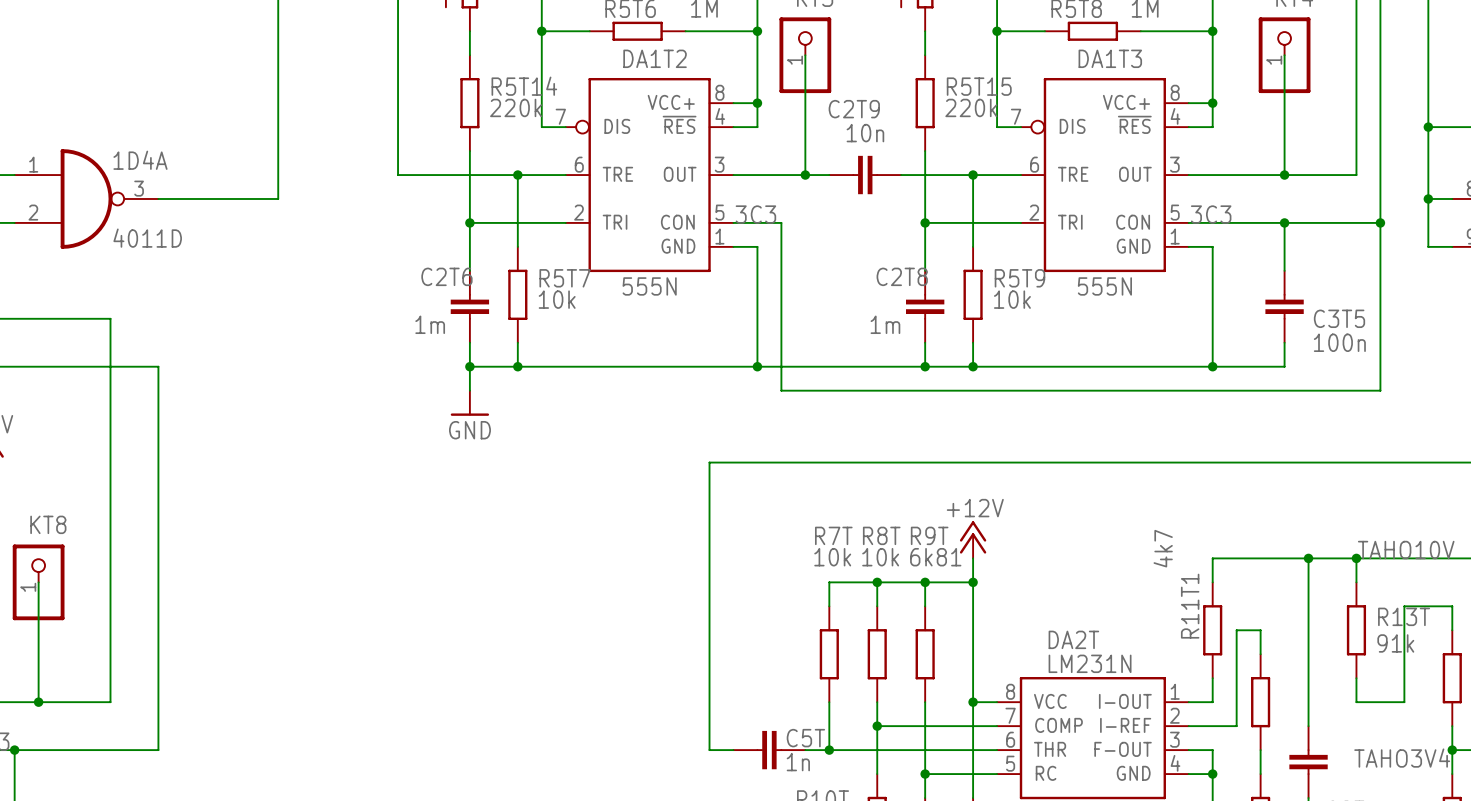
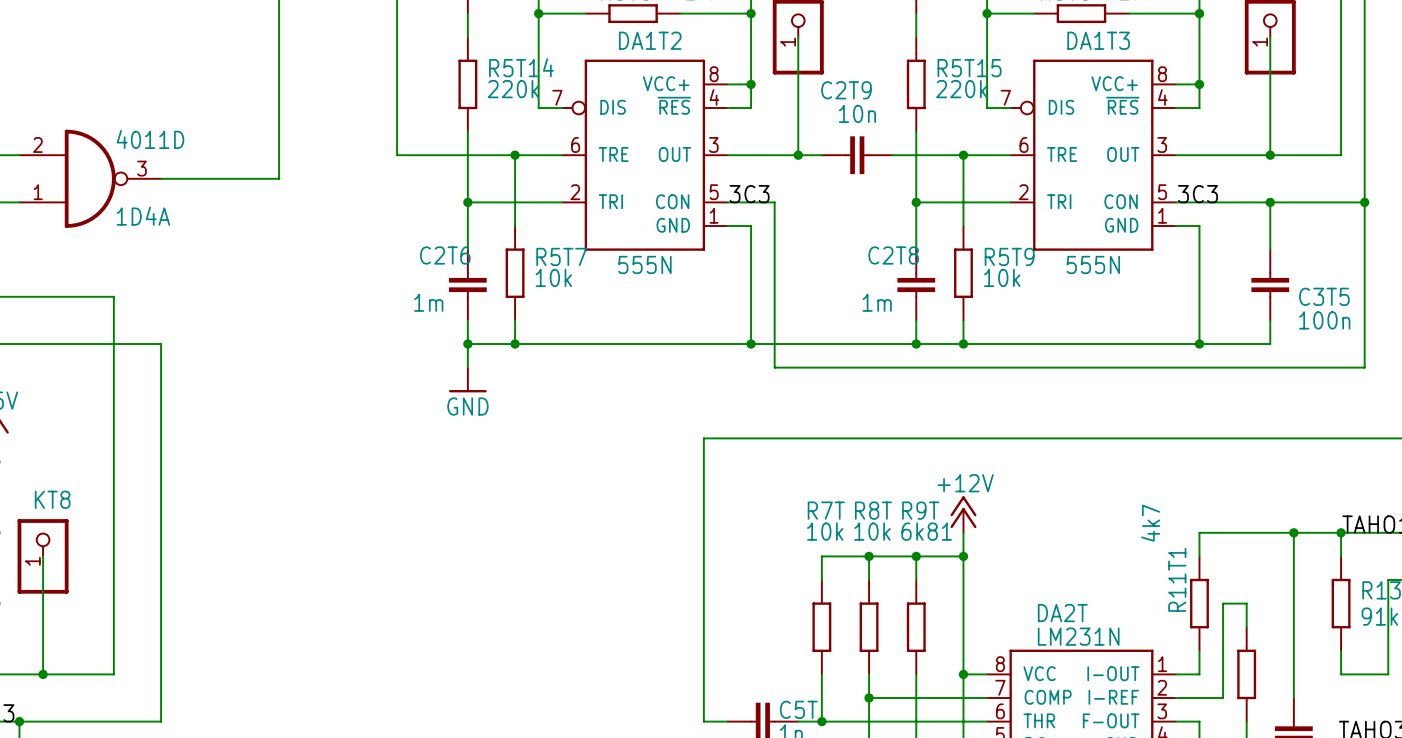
1D4A flip: as is (86, 198) -> up-down (90, 178)

